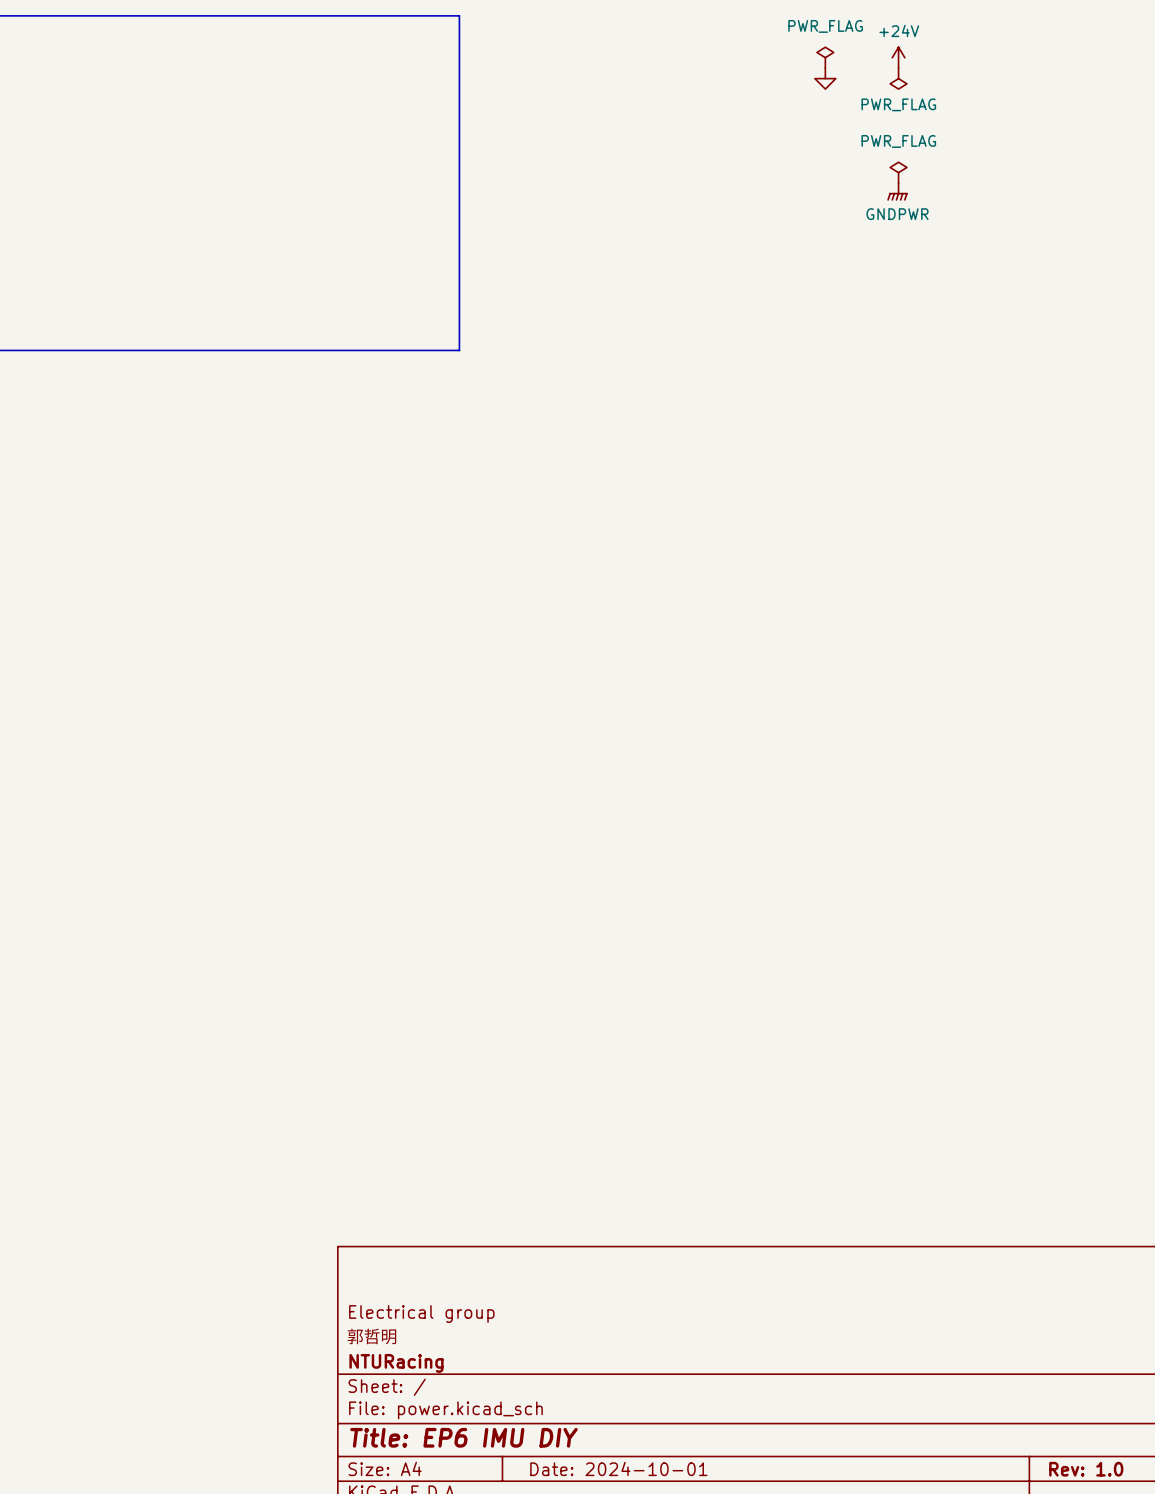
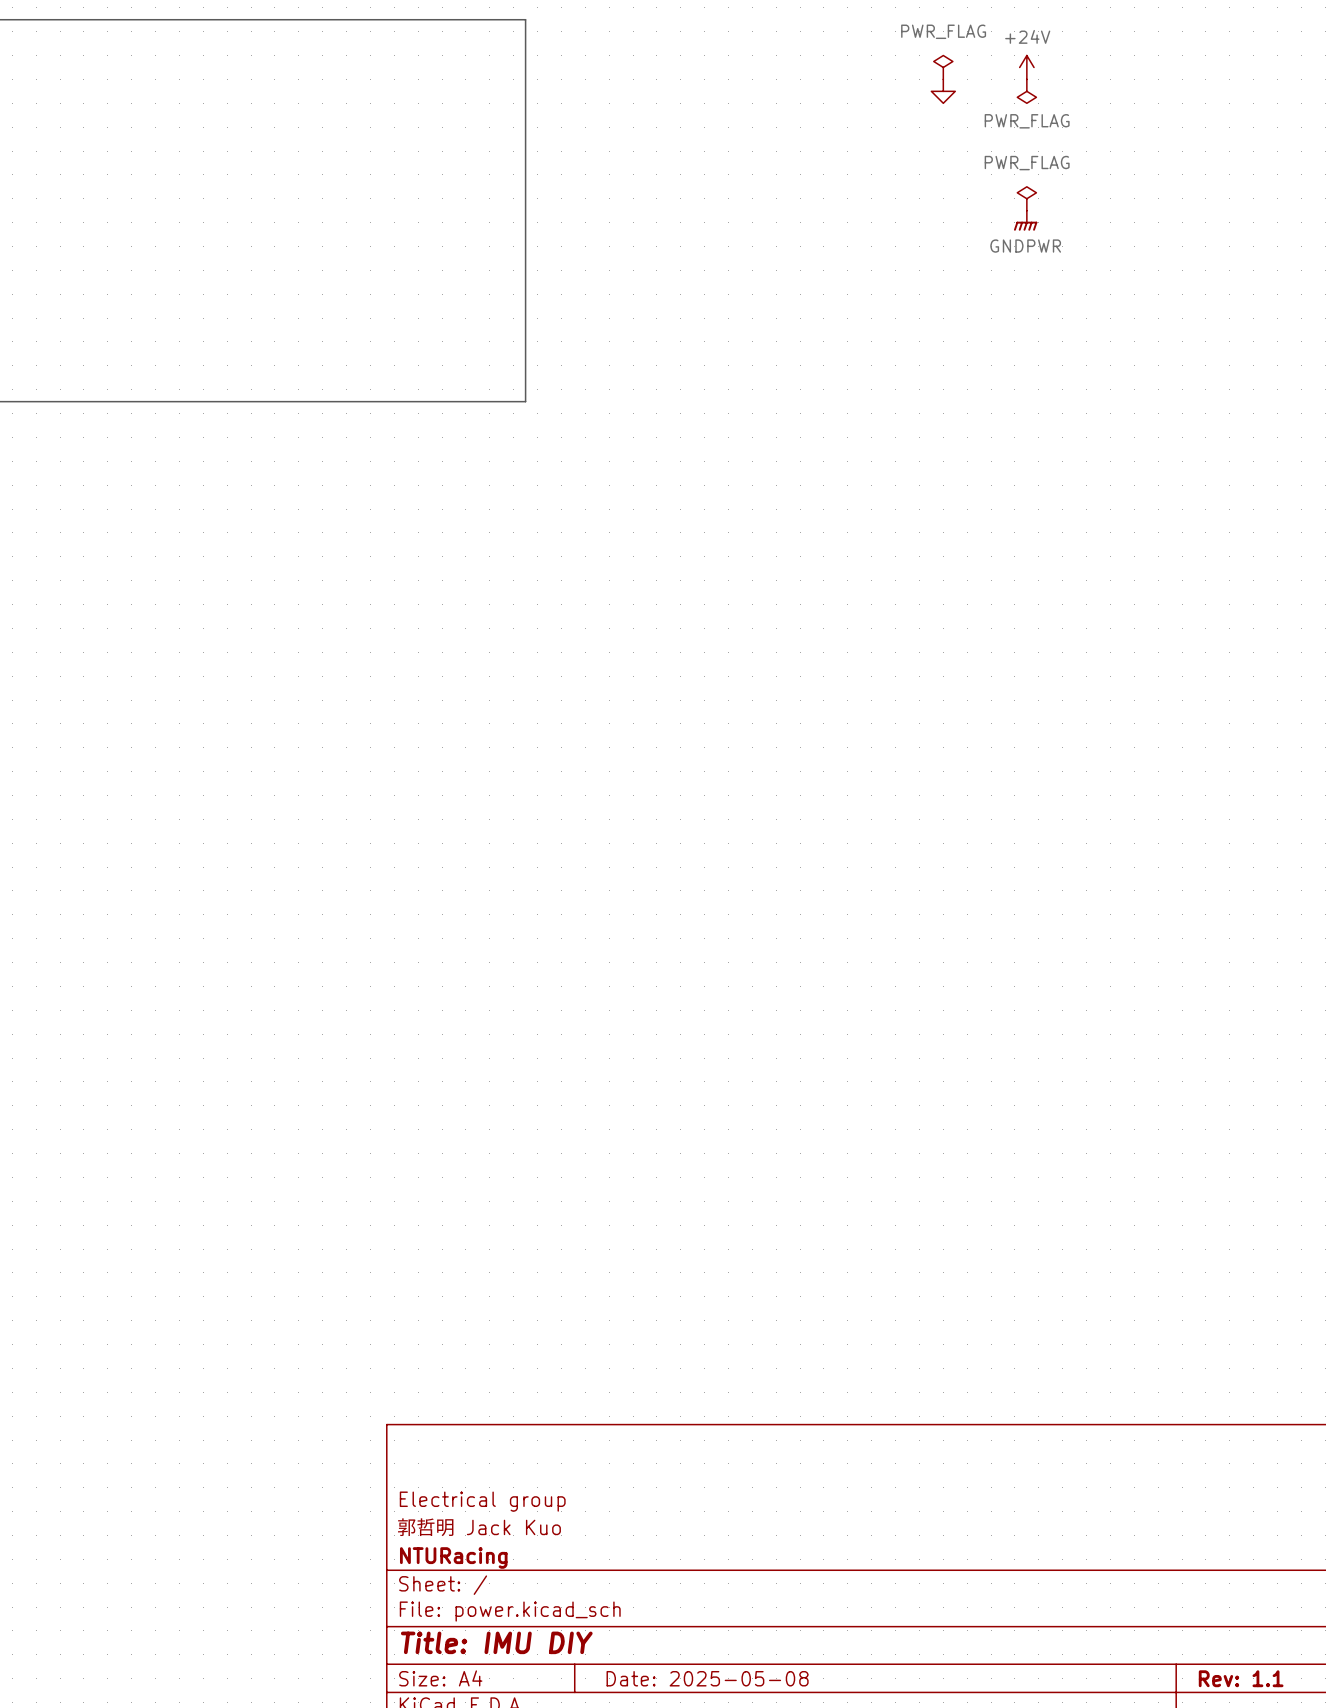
title block: 郭哲明 (371, 1336) -> 郭哲明 Jack Kuo (479, 1527)
title block: Title: EP6 IMU DIY (463, 1437) -> Title: IMU DIY (496, 1642)
title block: Date: 2024-10-01 (618, 1468) -> Date: 2025-05-08 (707, 1678)
title block: Rev: 1.0 (1086, 1469) -> Rev: 1.1 (1241, 1678)

